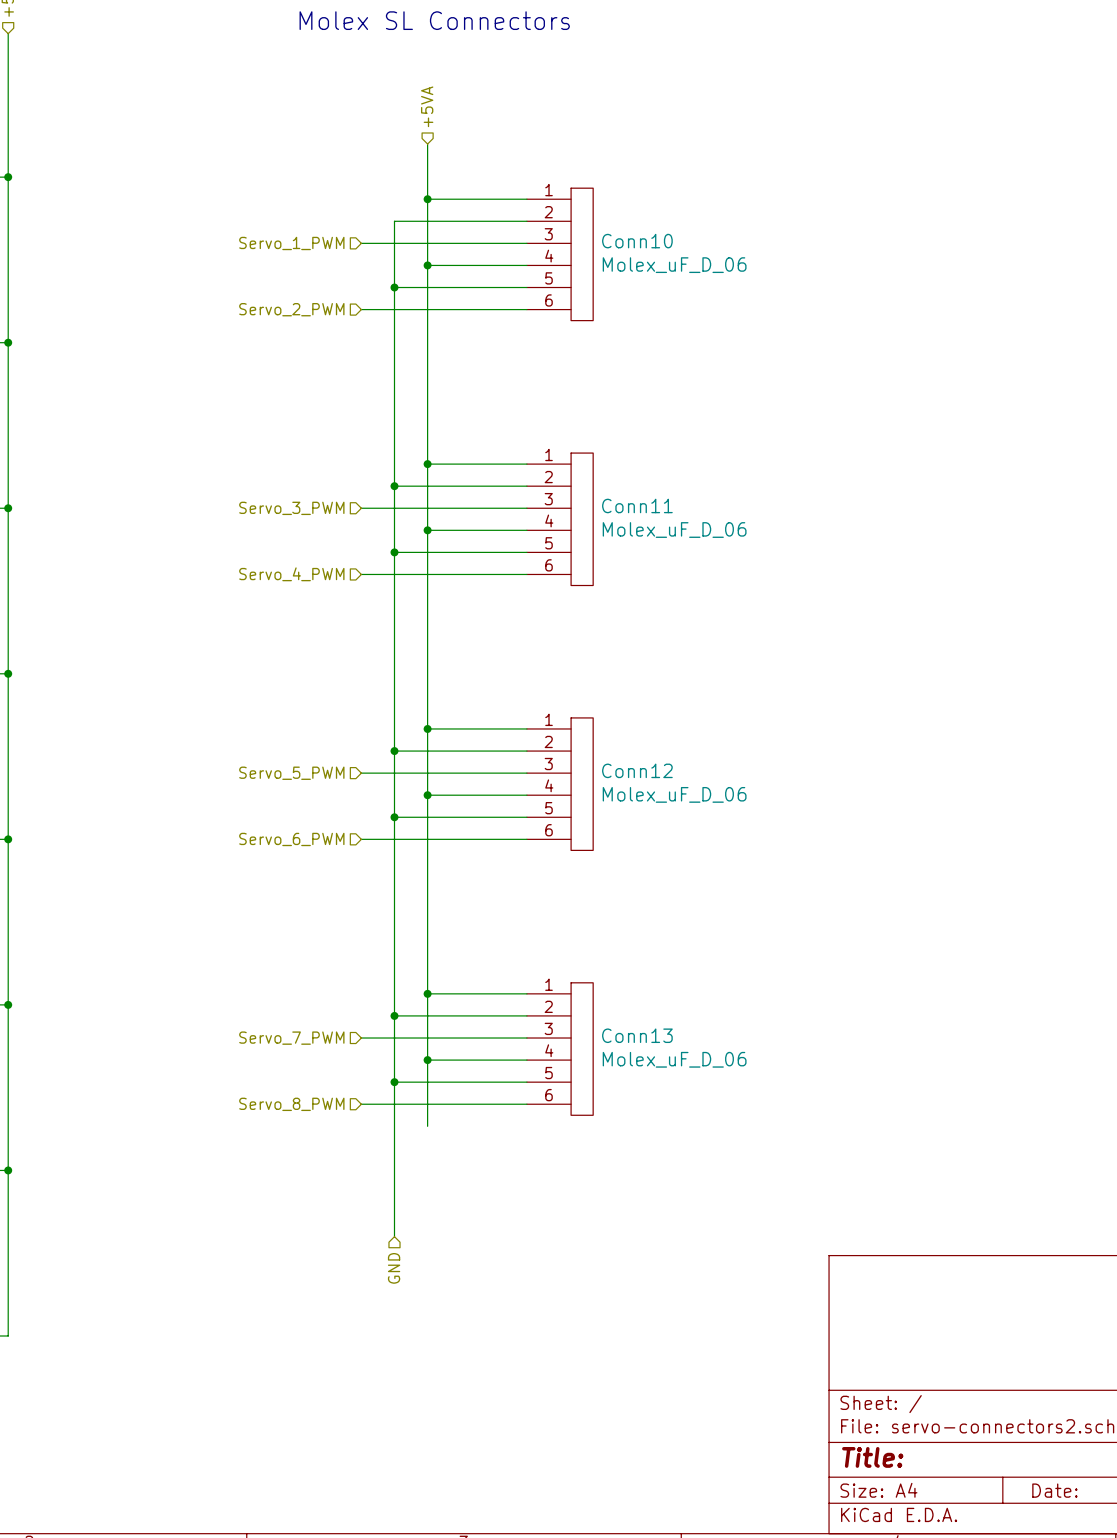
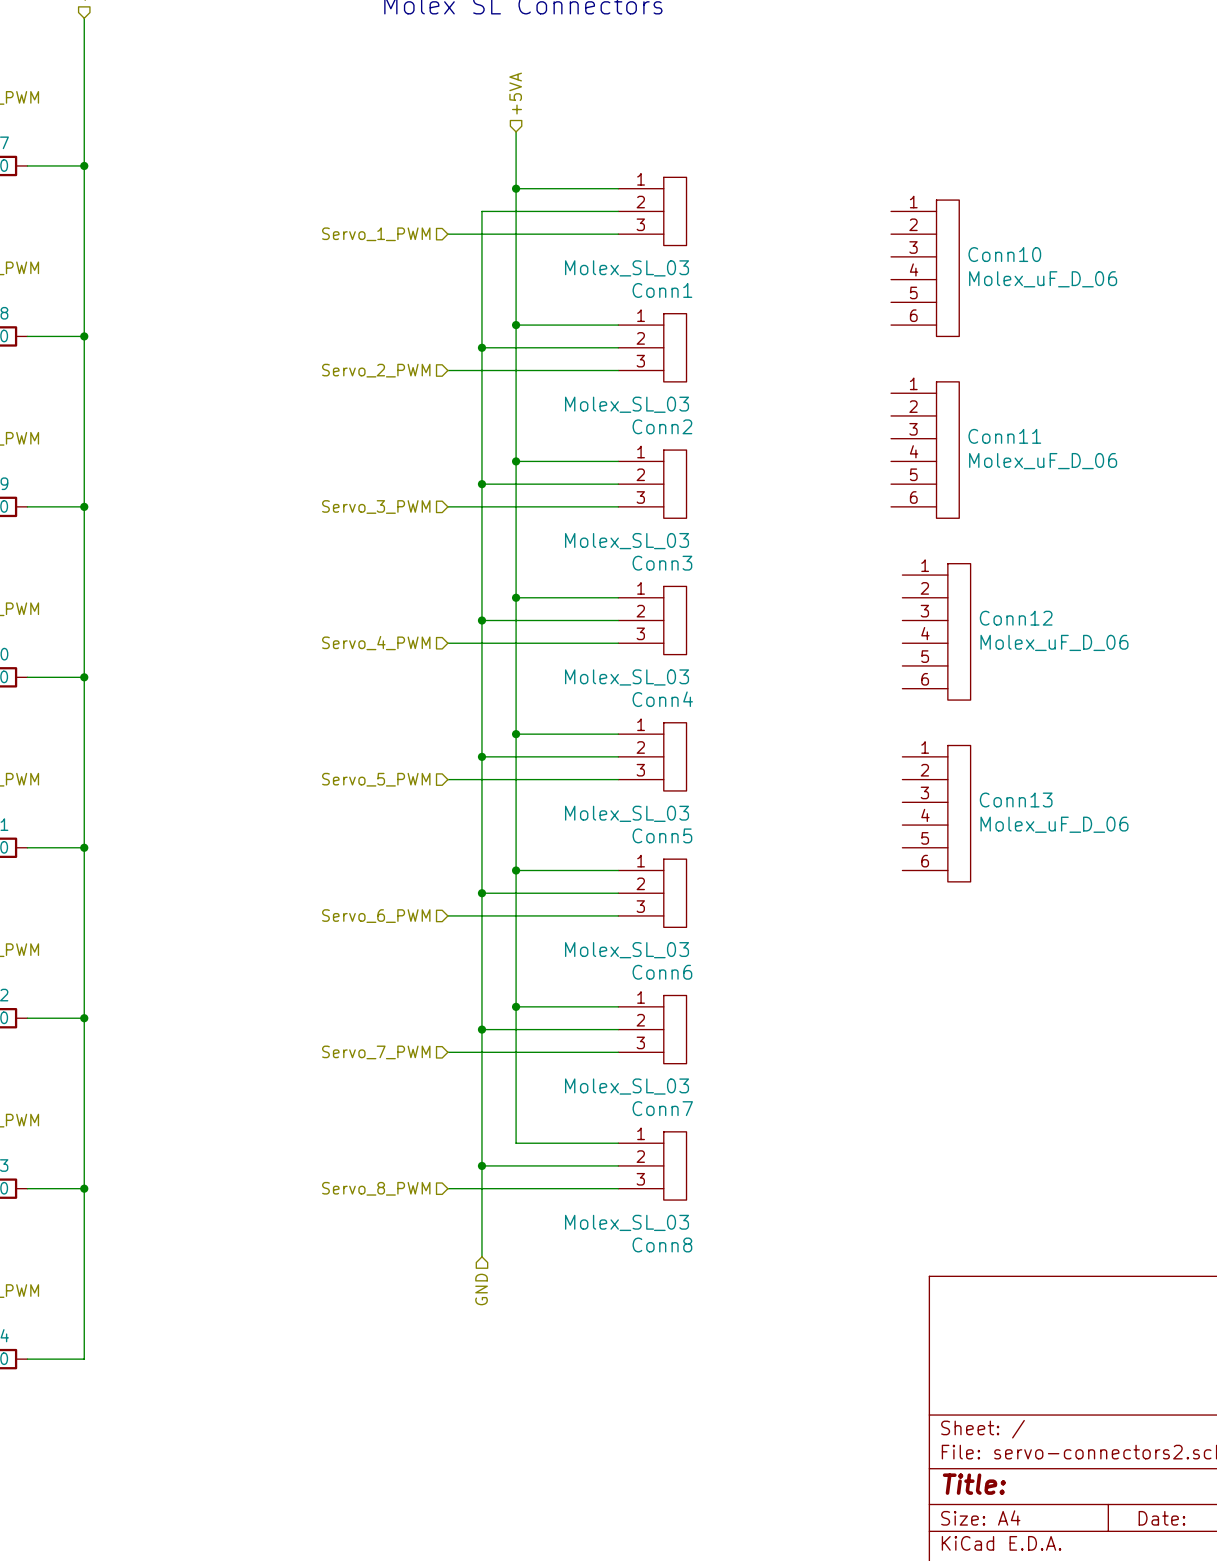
Conn1: none -> Molex_SL_03 (652, 211)
Conn10 position: (560, 254) -> (925, 268)
wire: (427, 265) (526, 265) -> (516, 325) (618, 325)
junction: (427, 265) -> none
wire: (394, 287) (526, 287) -> (481, 347) (618, 347)
junction: (394, 287) -> none
hierarchical label position: Servo_2_PWM (291, 309) -> Servo_2_PWM (376, 370)
wire: (361, 309) (526, 309) -> (447, 370) (618, 370)
junction: none -> (516, 325)
junction: none -> (481, 347)
Conn2: none -> Molex_SL_03 (652, 347)
Conn3: none -> Molex_SL_03 (652, 484)
Conn11 position: (560, 519) -> (925, 450)
wire: (427, 530) (526, 530) -> (516, 597) (618, 597)
junction: (427, 530) -> none
wire: (394, 552) (526, 552) -> (481, 620) (618, 620)
junction: (394, 552) -> none
hierarchical label position: Servo_4_PWM (291, 574) -> Servo_4_PWM (376, 643)
wire: (361, 574) (526, 574) -> (447, 643) (618, 643)
junction: none -> (516, 597)
junction: none -> (481, 620)
Conn4: none -> Molex_SL_03 (652, 620)
Conn5: none -> Molex_SL_03 (652, 756)
Conn12 position: (560, 784) -> (936, 631)
wire: (427, 795) (526, 795) -> (516, 870) (618, 870)
junction: (427, 795) -> none
wire: (394, 817) (526, 817) -> (481, 893) (618, 893)
junction: (394, 817) -> none
hierarchical label position: Servo_6_PWM (291, 839) -> Servo_6_PWM (376, 916)
wire: (361, 839) (526, 839) -> (447, 915) (618, 915)
junction: none -> (516, 870)
junction: none -> (481, 893)
Conn6: none -> Molex_SL_03 (652, 893)
Conn7: none -> Molex_SL_03 (652, 1029)
Conn13 position: (560, 1049) -> (936, 813)
wire: (427, 1060) (526, 1060) -> (516, 1143) (618, 1143)
junction: (427, 1060) -> none
wire: (394, 1082) (526, 1082) -> (481, 1165) (618, 1165)
junction: (394, 1082) -> none
hierarchical label position: Servo_8_PWM (291, 1104) -> Servo_8_PWM (376, 1188)
wire: (361, 1104) (526, 1104) -> (447, 1188) (618, 1188)
junction: none -> (481, 1165)
Conn8: none -> Molex_SL_03 (652, 1165)

